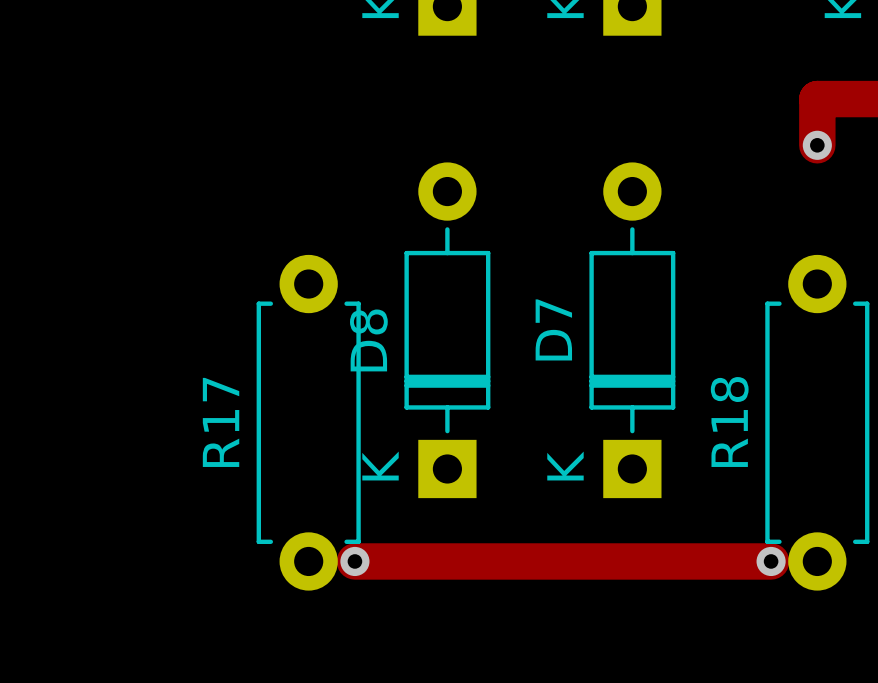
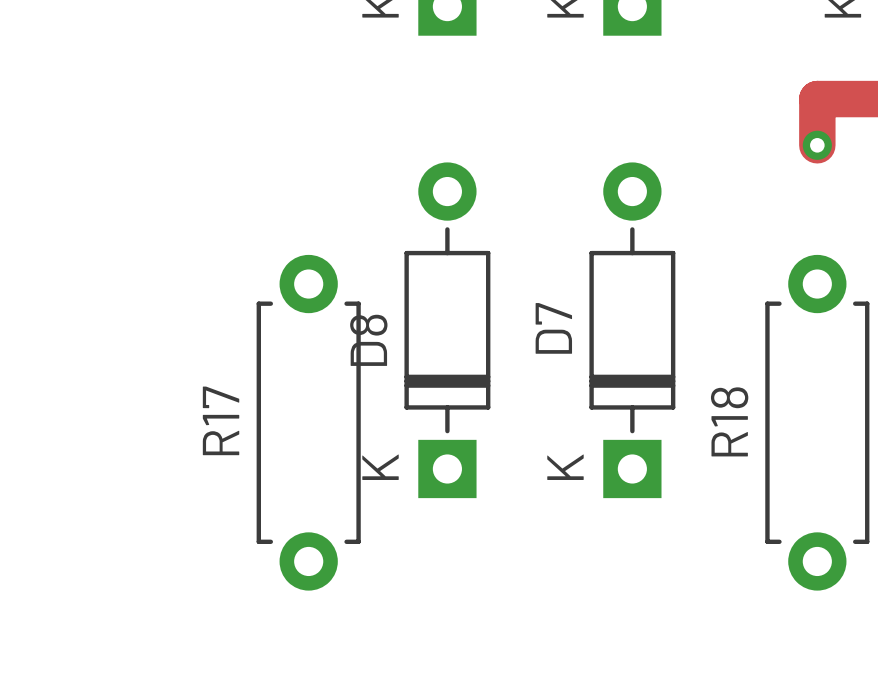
track: (354, 561) (771, 561) -> none
via: (354, 561) -> none
via: (771, 561) -> none

